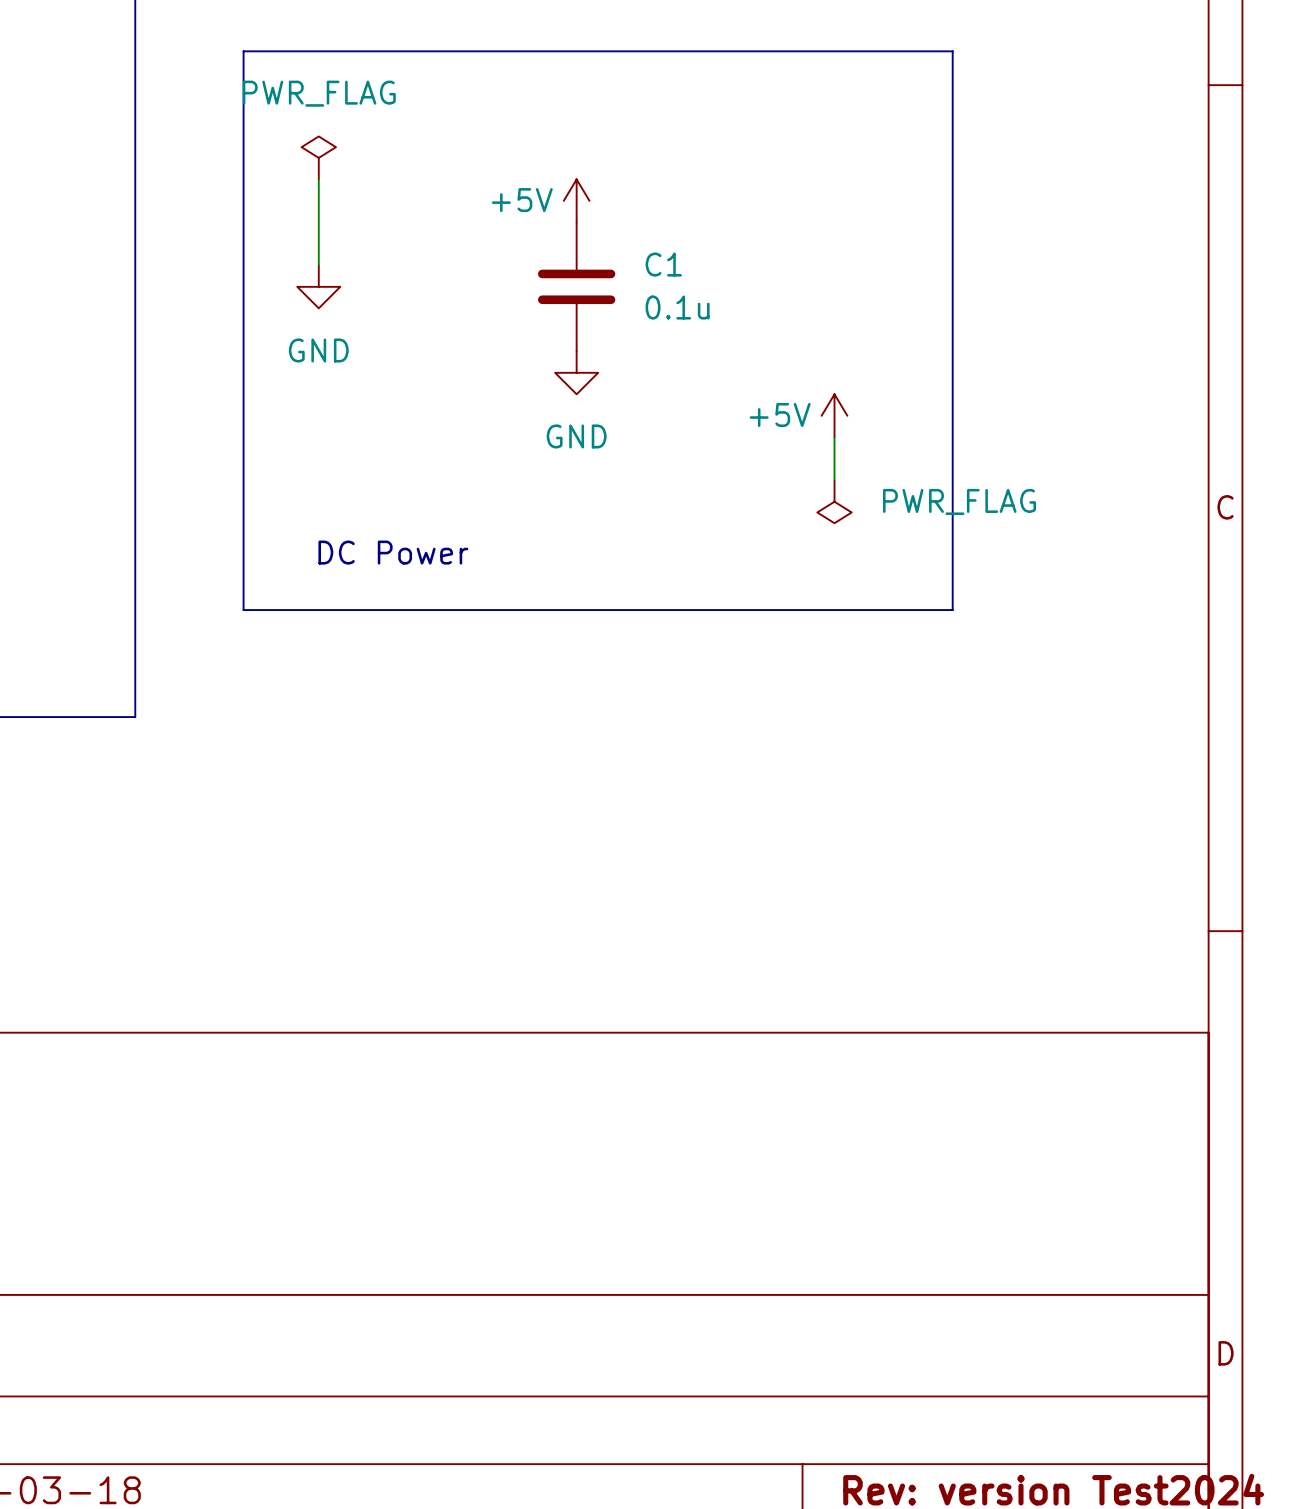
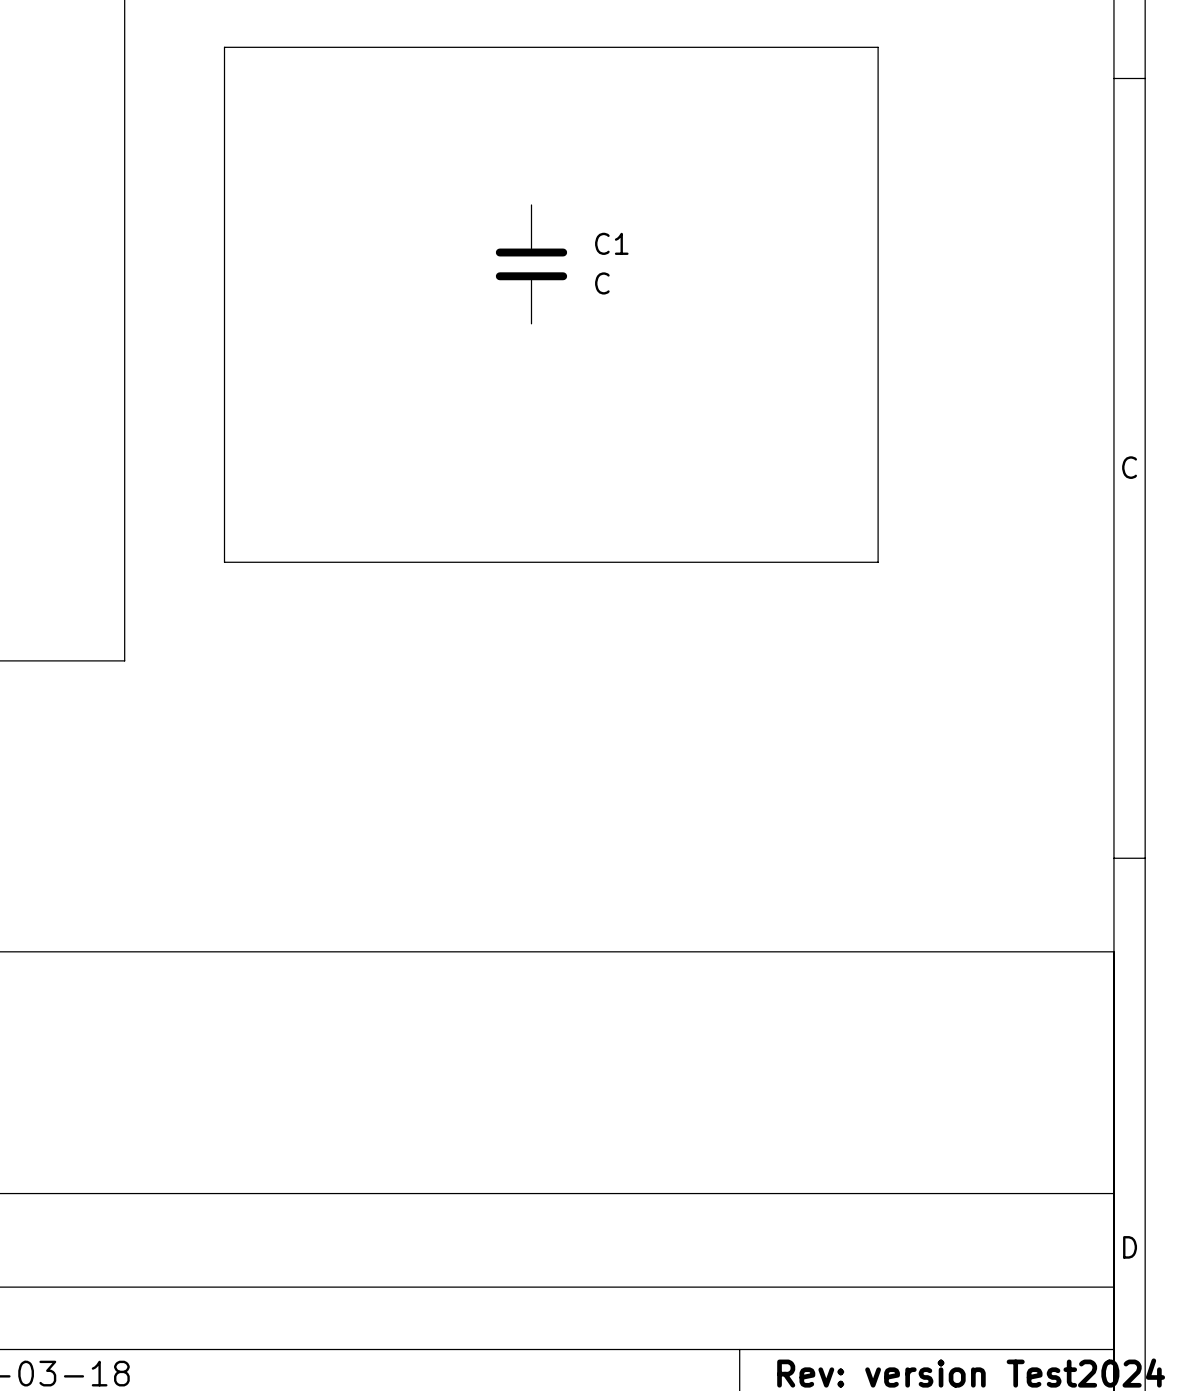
power symbol: PWR_FLAG (318, 157) -> none
wire: (318, 179) (318, 265) -> none
power symbol: +5V (576, 200) -> none
power symbol: GND (318, 286) -> none
C1 value: 0.1u (677, 307) -> C (602, 283)
power symbol: GND (576, 372) -> none
power symbol: +5V (834, 415) -> none
wire: (834, 437) (834, 480) -> none
power symbol: PWR_FLAG (834, 501) -> none
text: DC Power (393, 552) -> none

